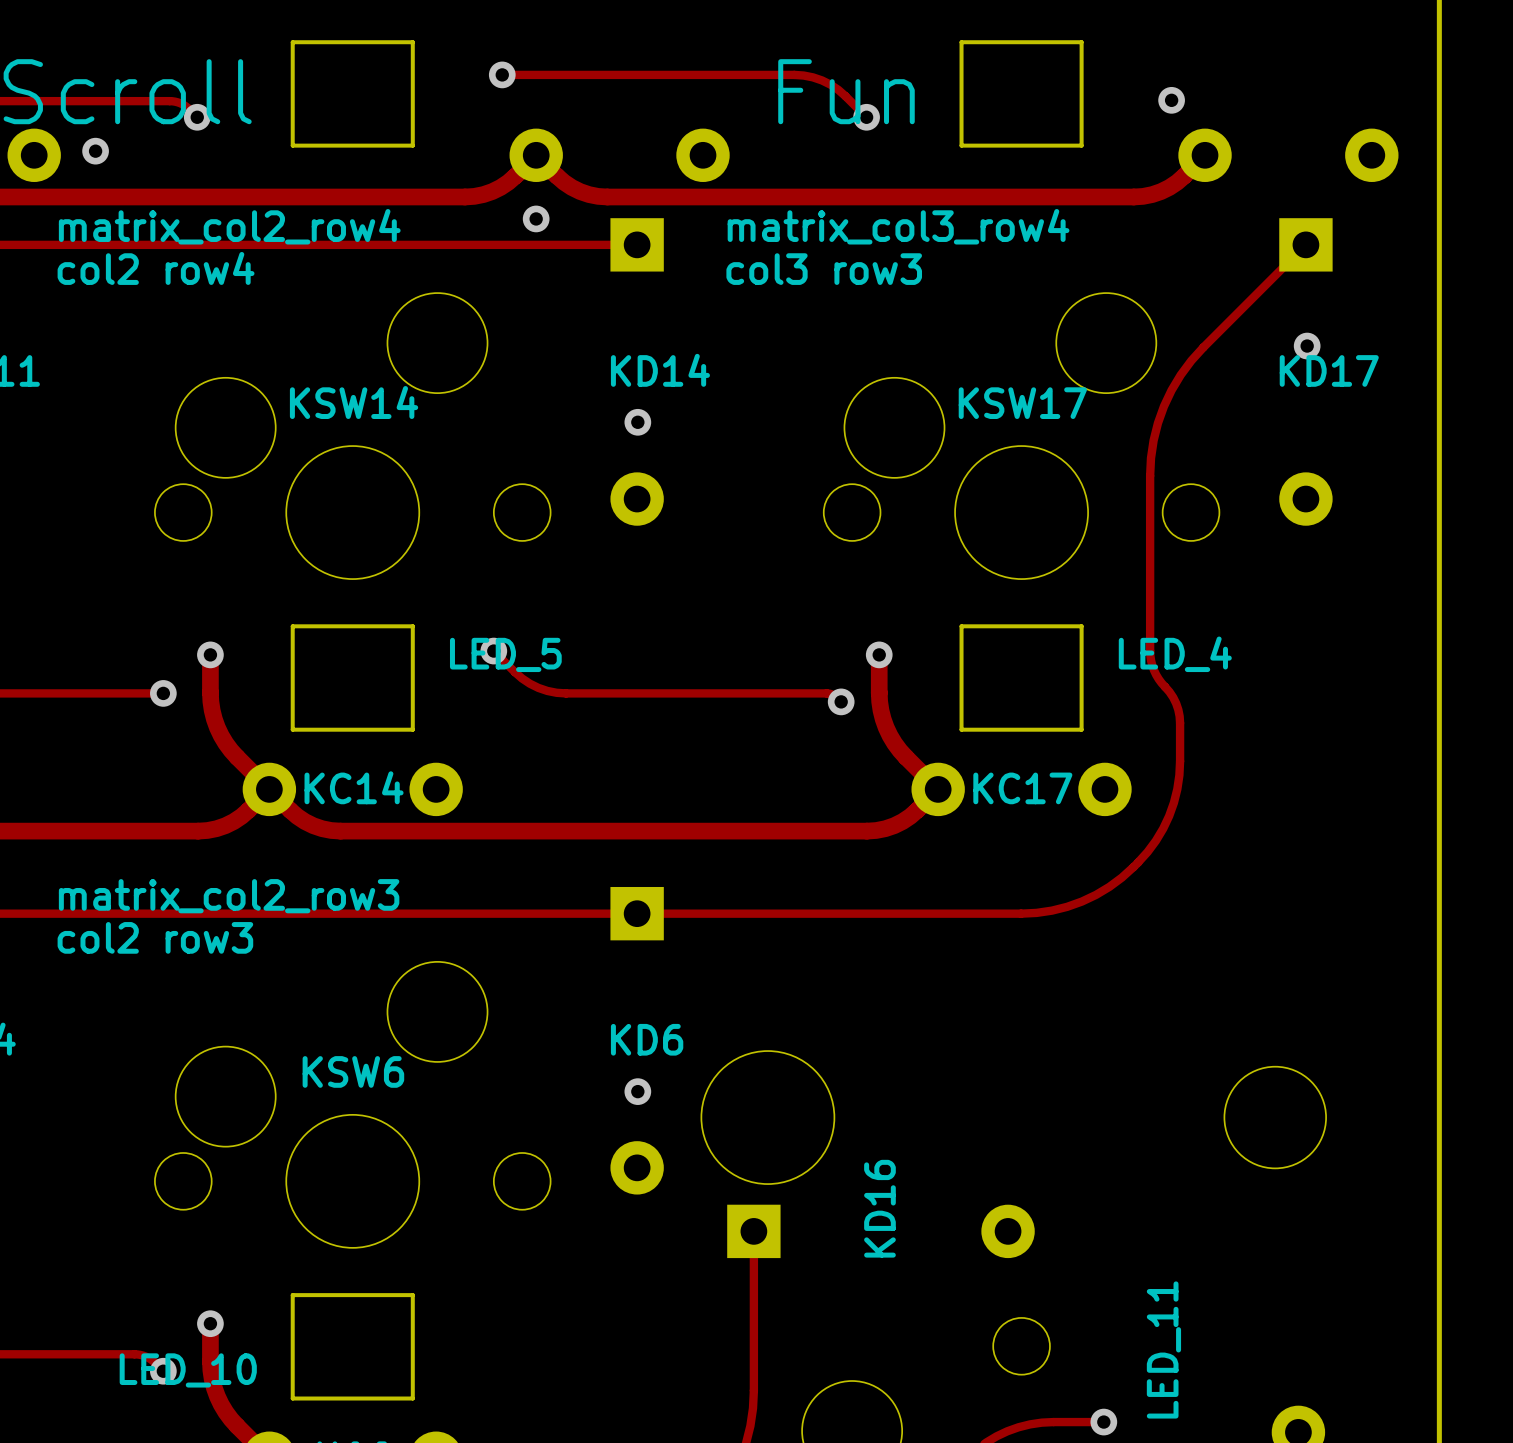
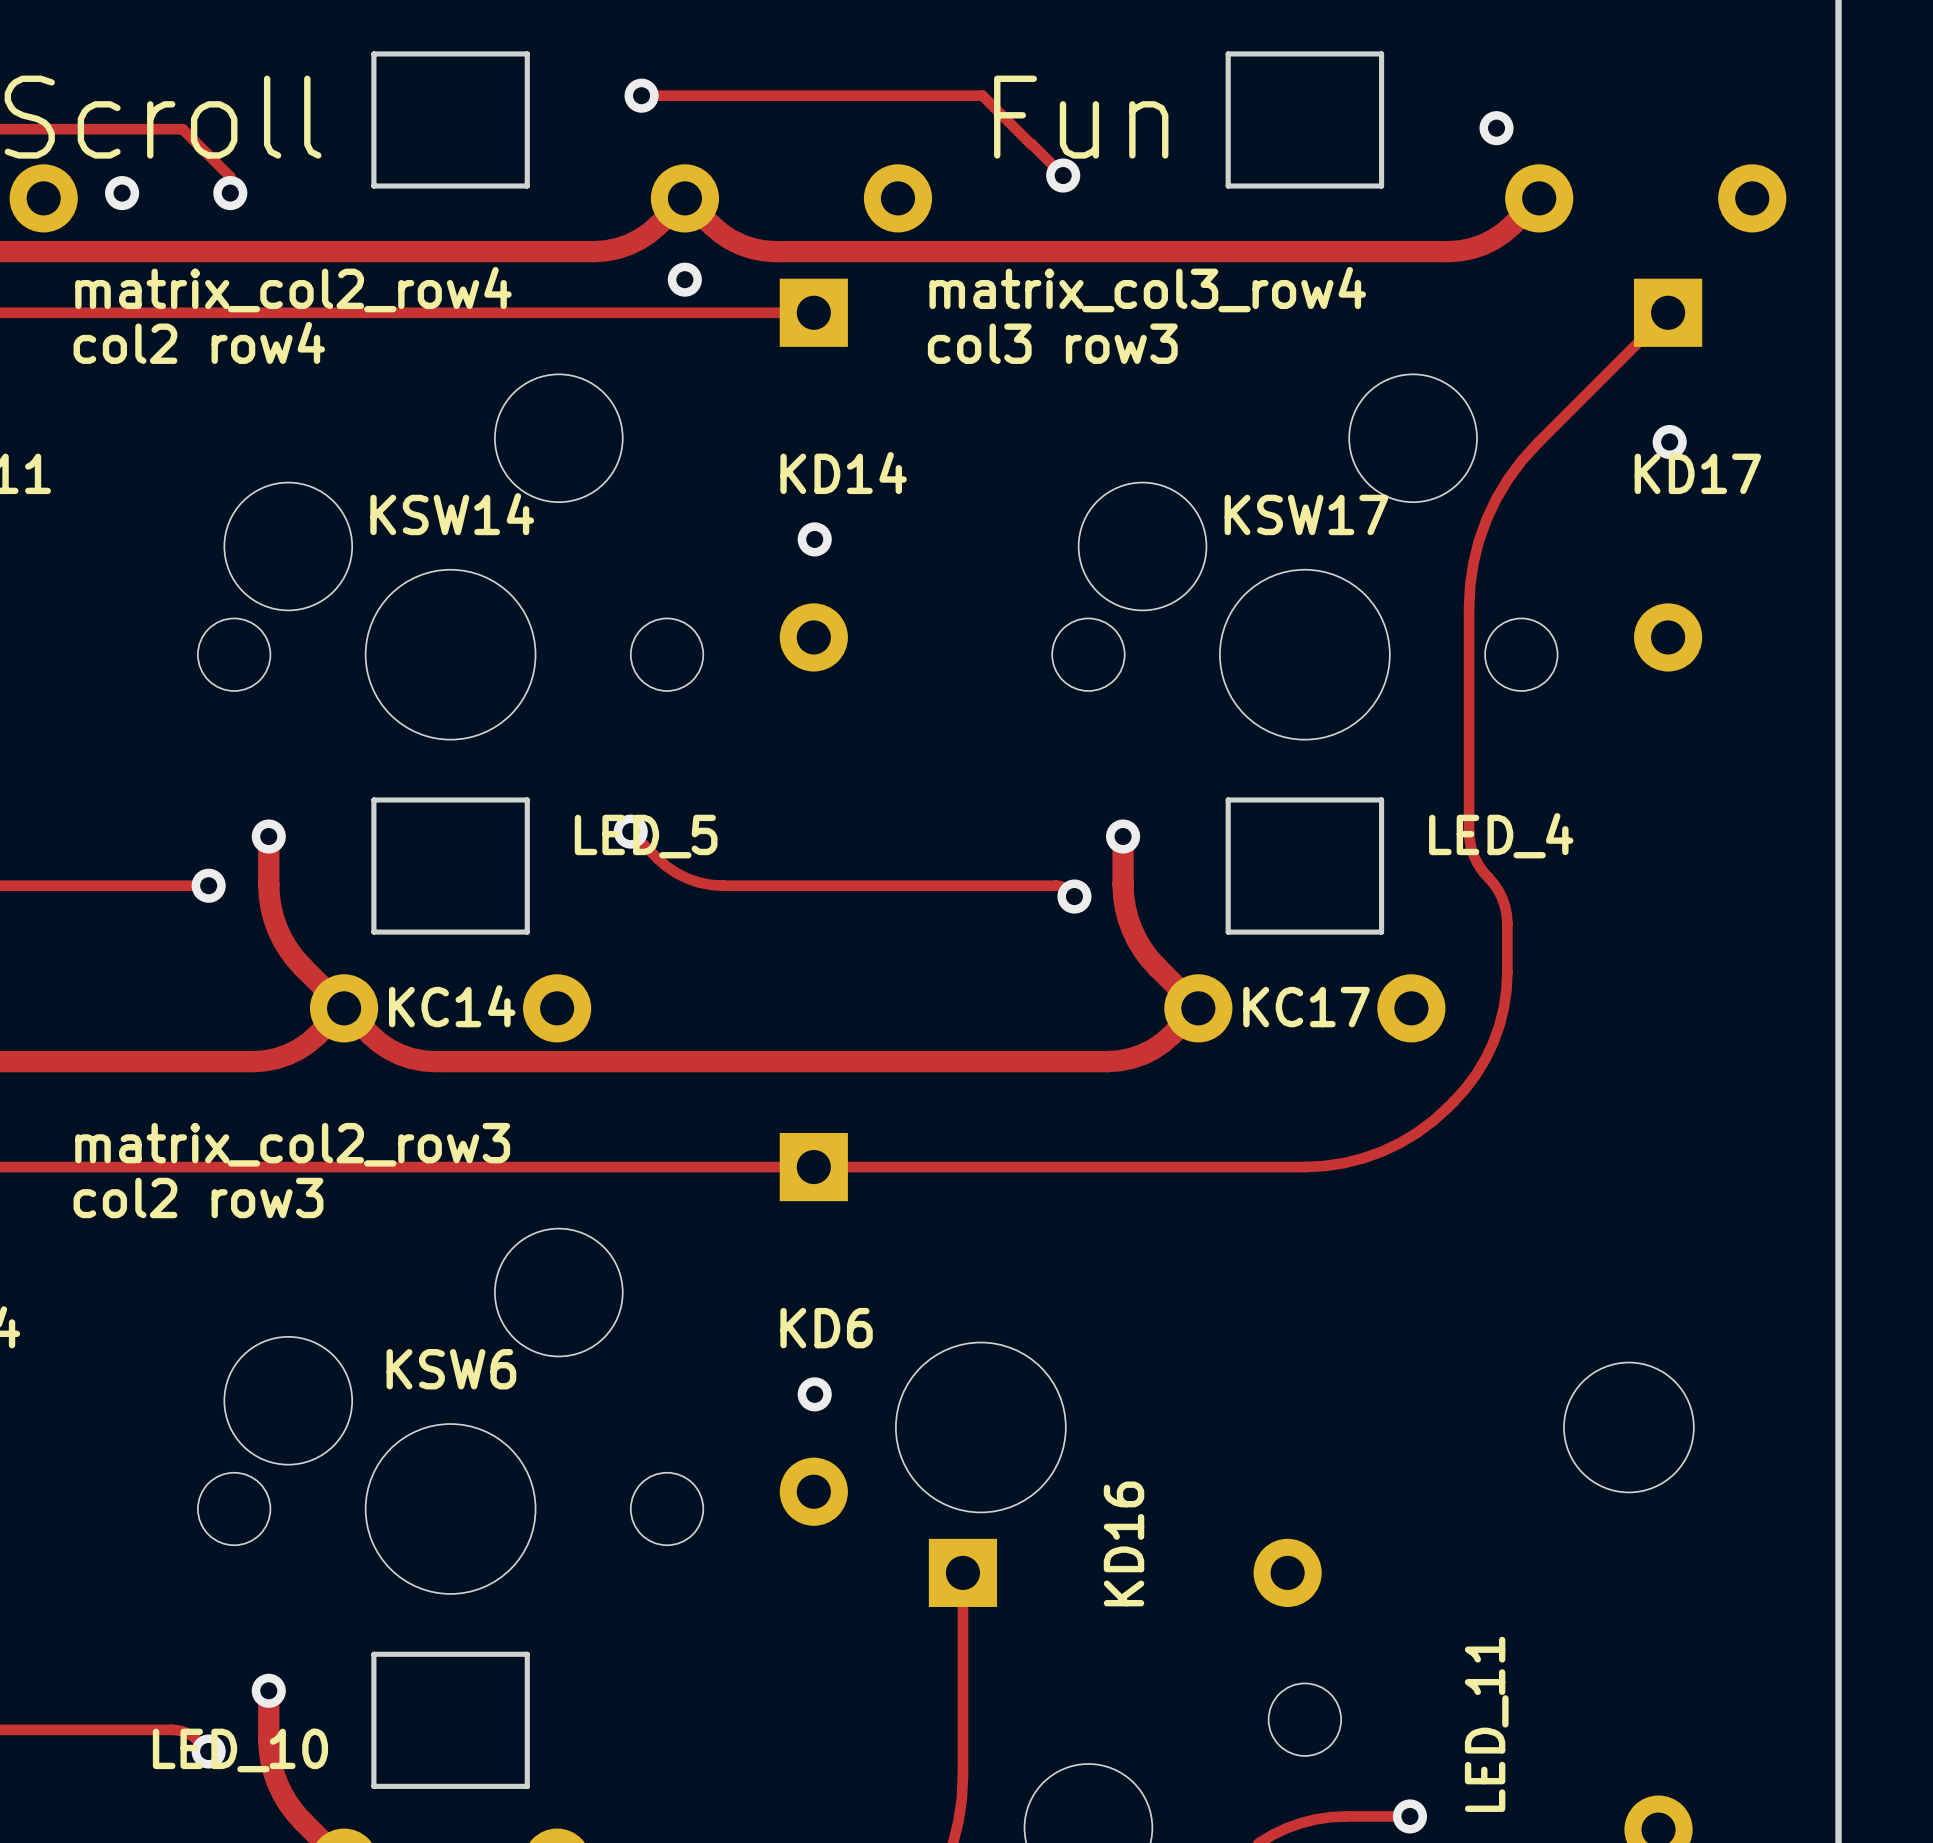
track: (769, 74) (803, 75) (821, 80) (838, 89) (866, 117) -> (982, 95) (1063, 175)
track: (142, 101) (177, 102) (187, 107) (197, 117) -> (182, 129) (230, 176) (230, 193)
via position: (197, 117) -> (230, 193)
via position: (866, 117) -> (1063, 175)

